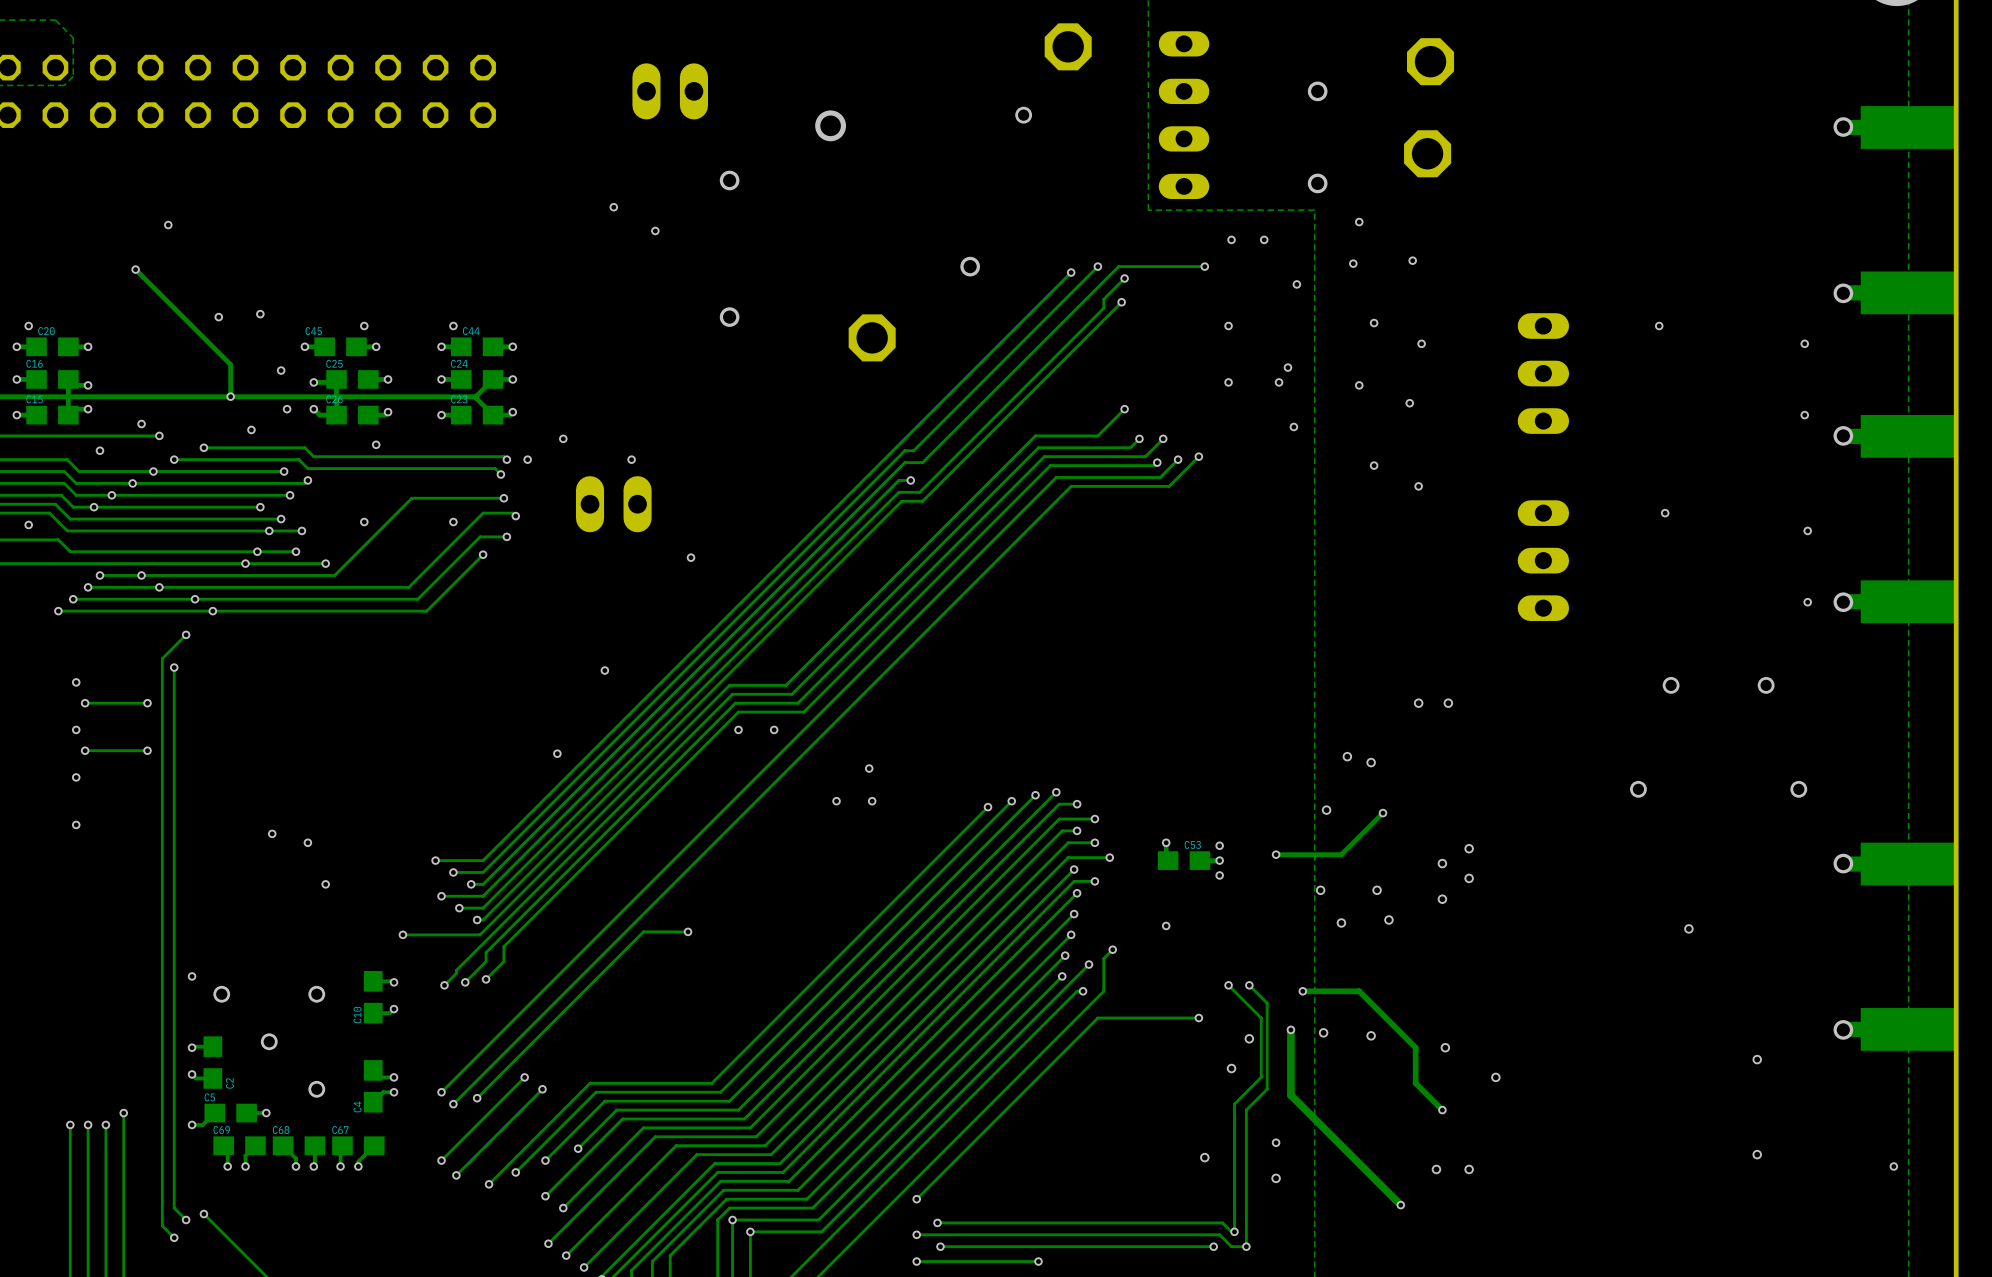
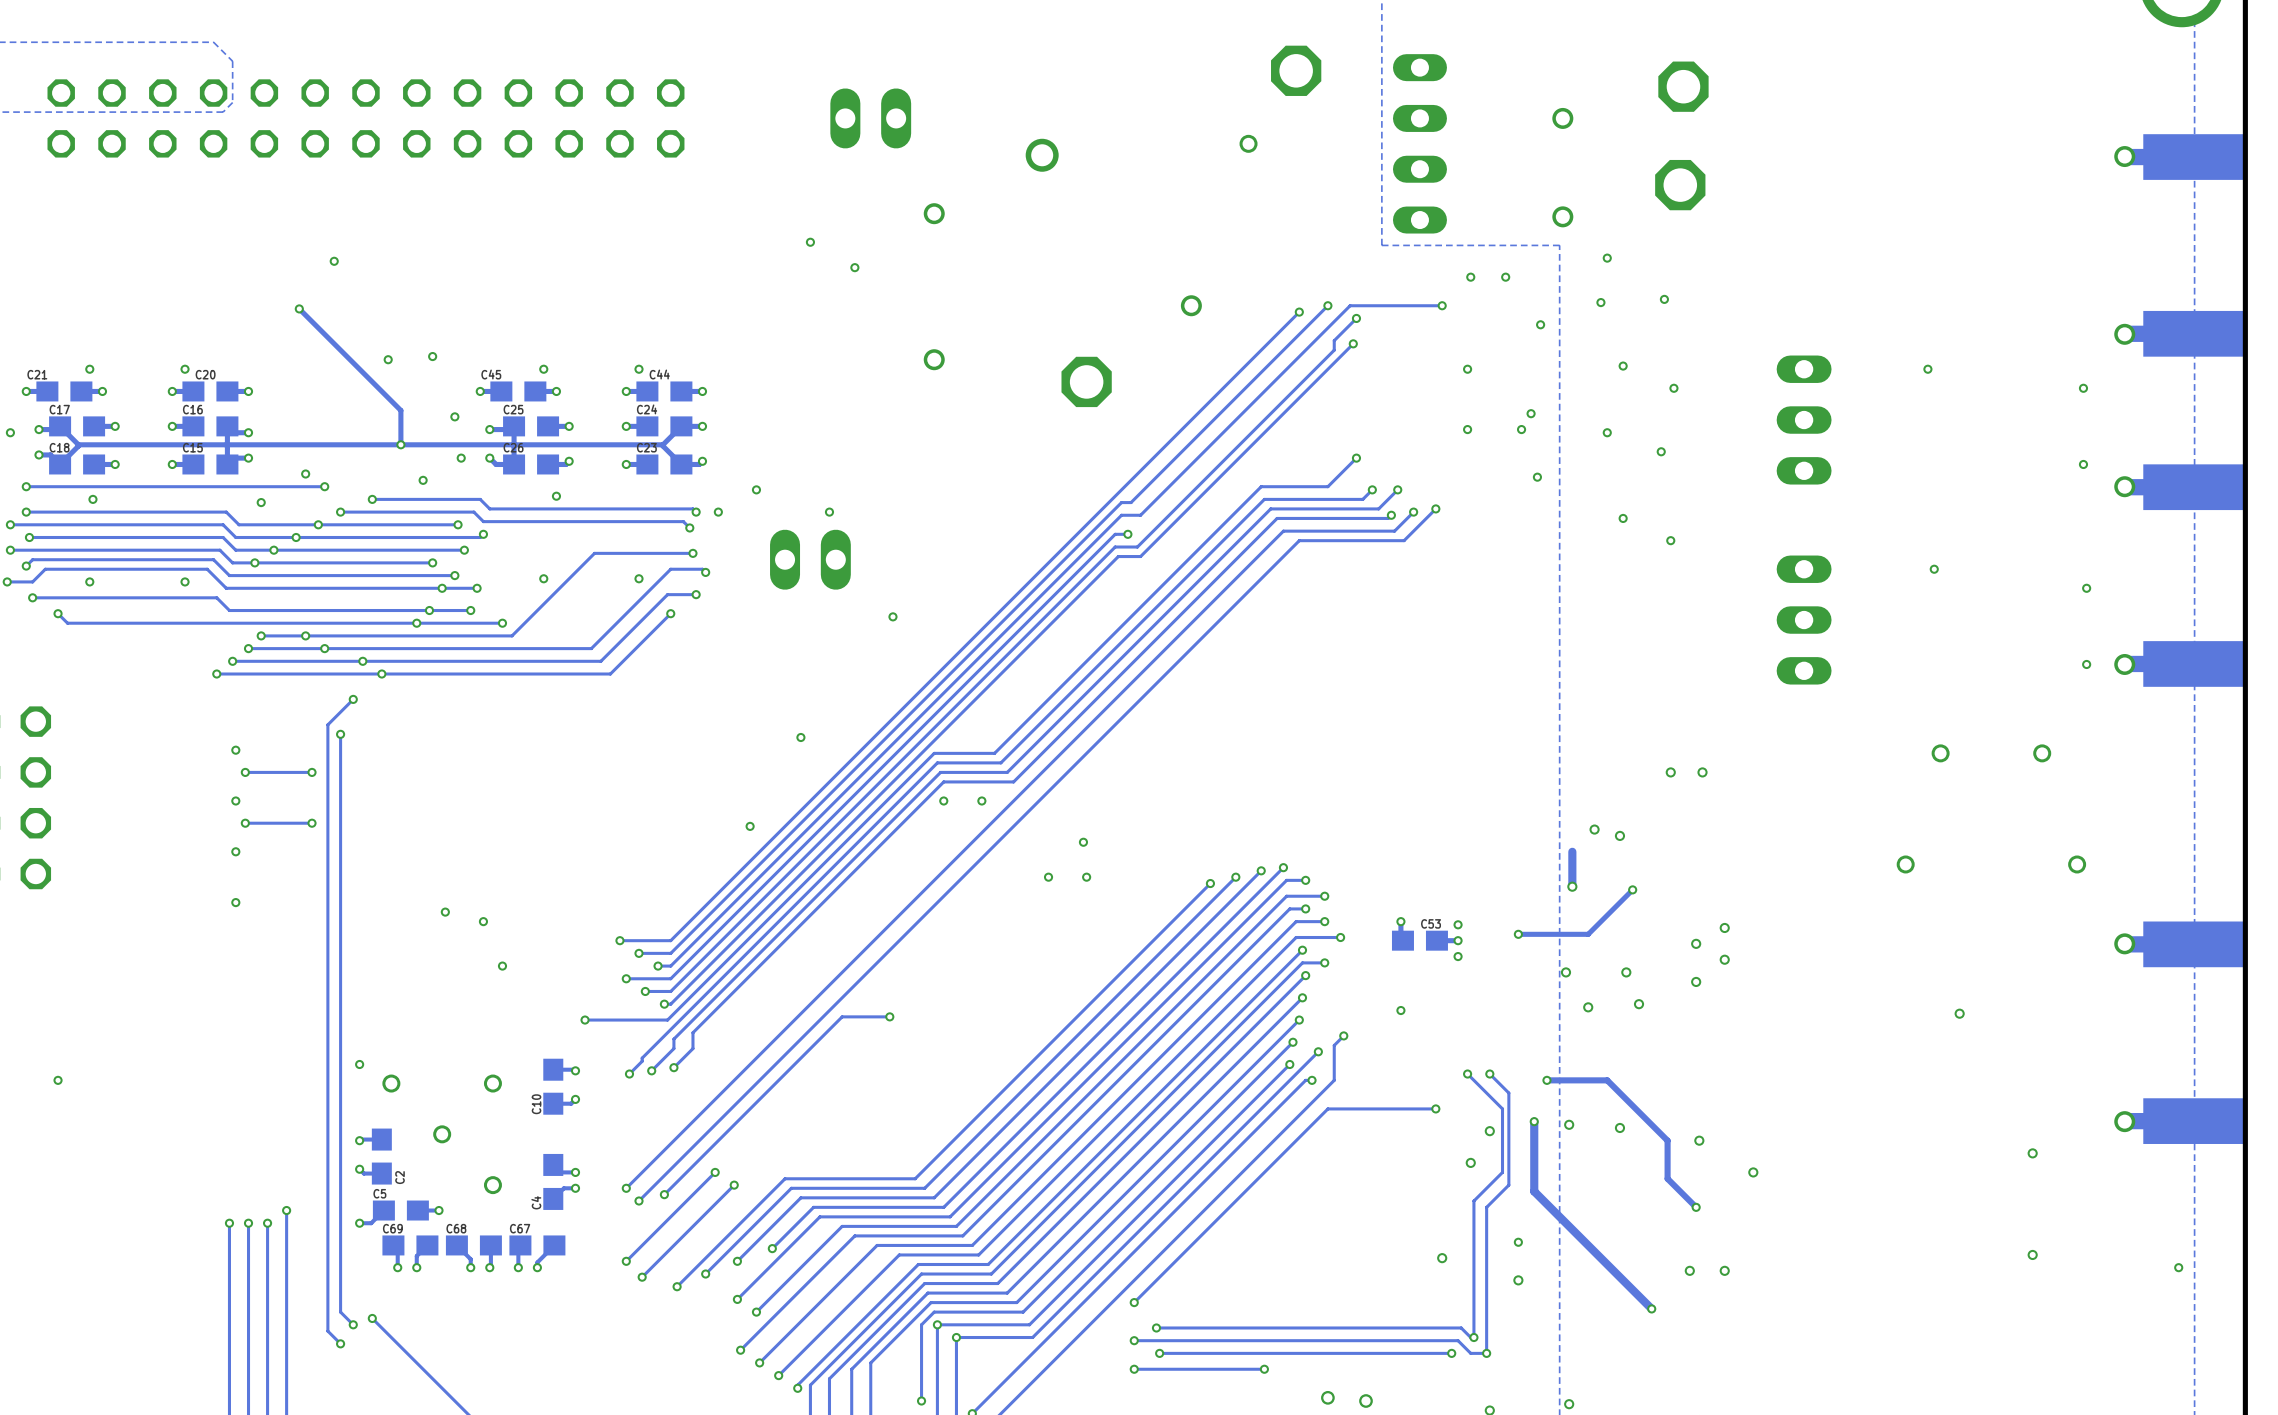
track: none -> (1572, 851) (1572, 886)

